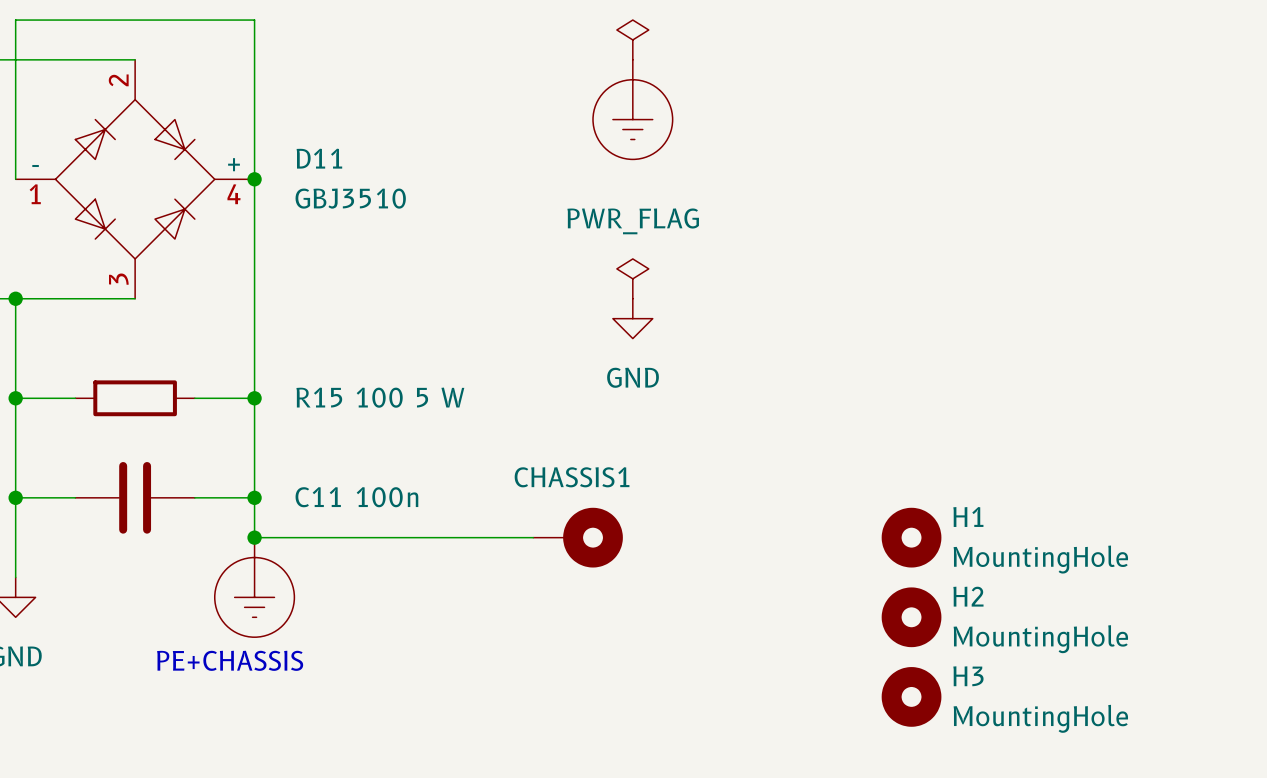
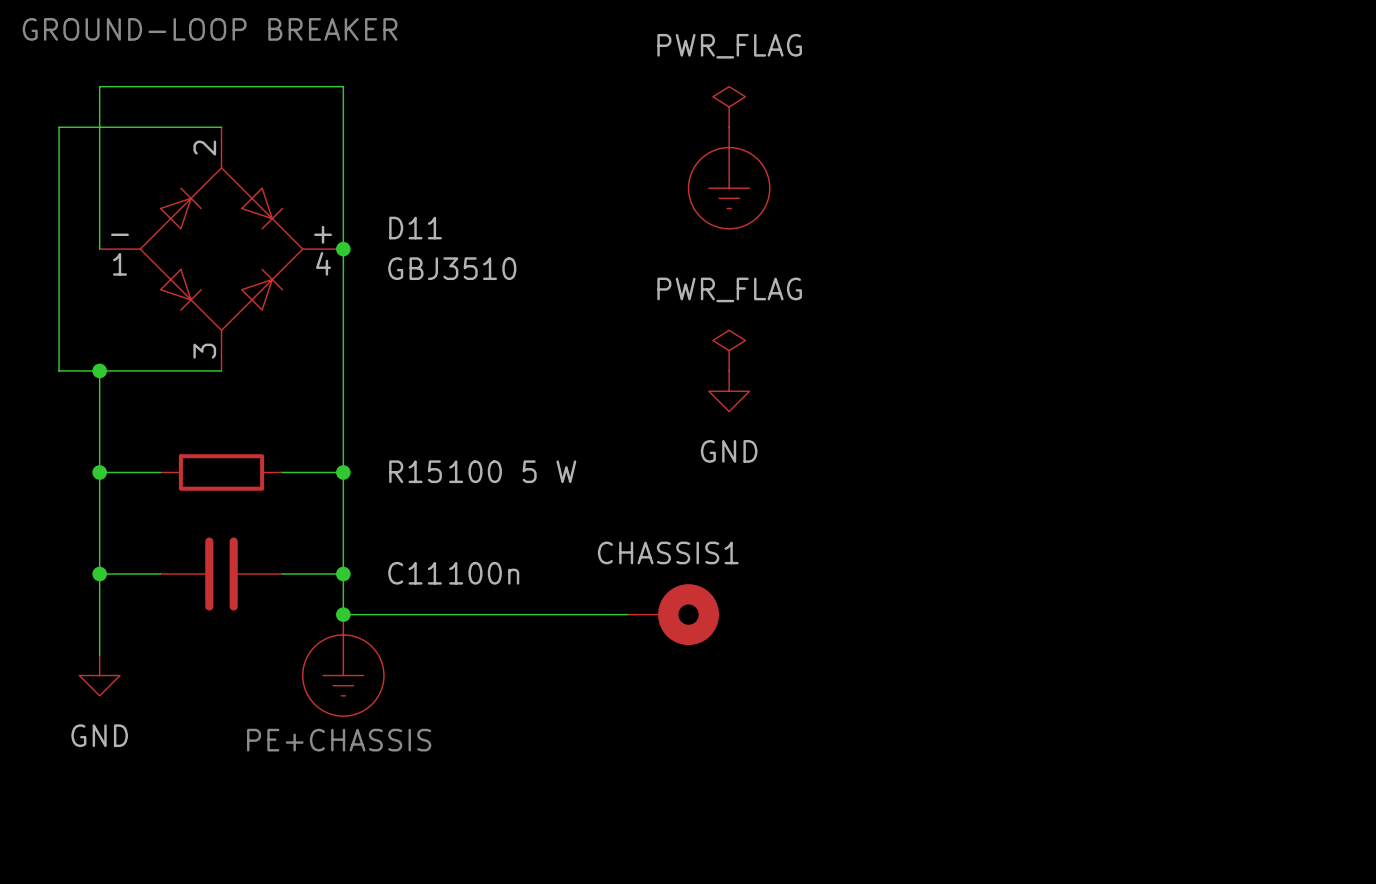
H1: MountingHole (911, 537) -> none
H2: MountingHole (911, 617) -> none
H3: MountingHole (911, 696) -> none

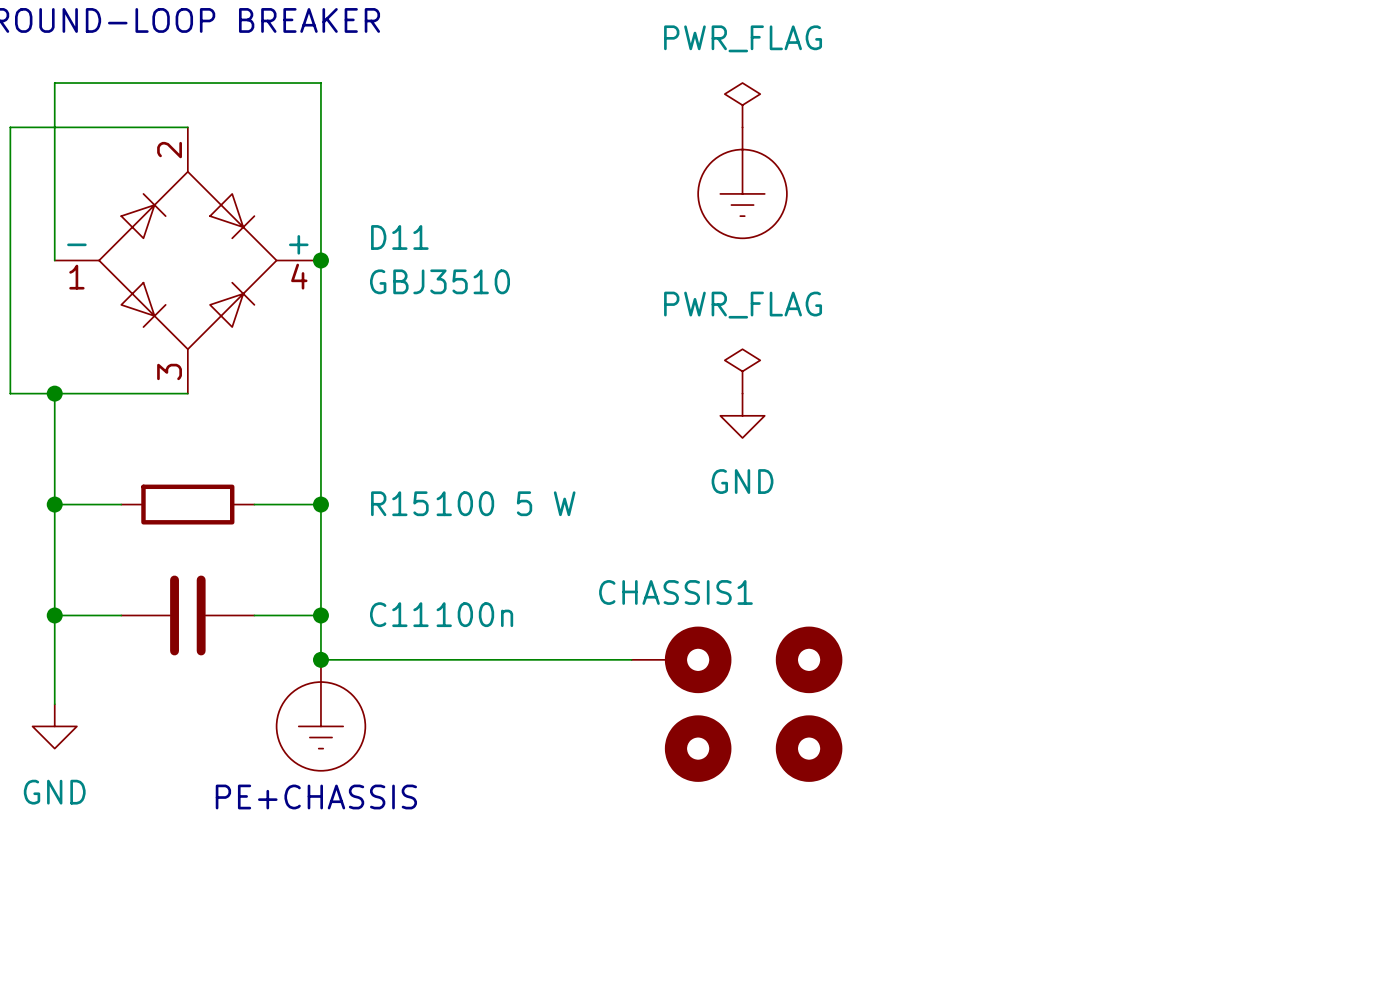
part: none -> (809, 659)
part: none -> (698, 748)
part: none -> (809, 748)

